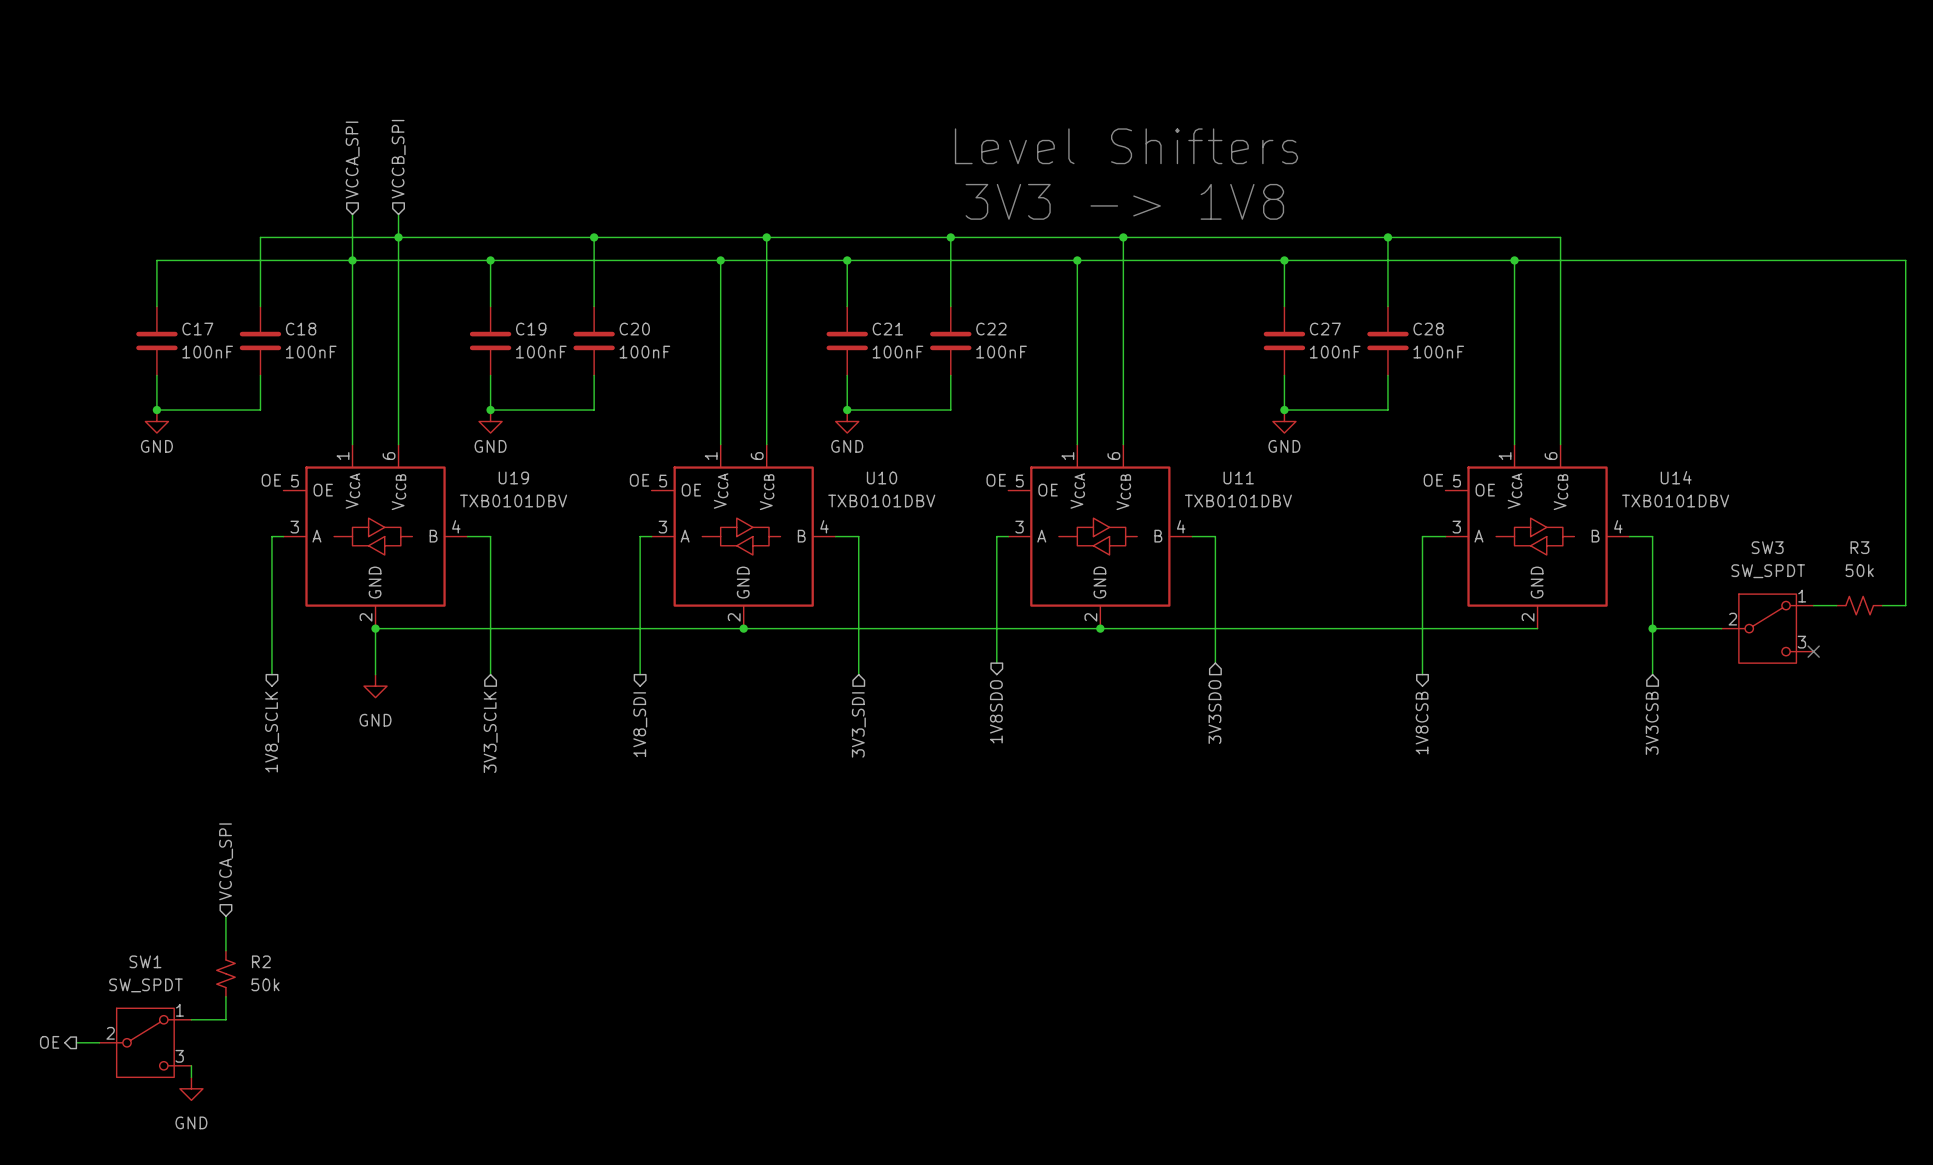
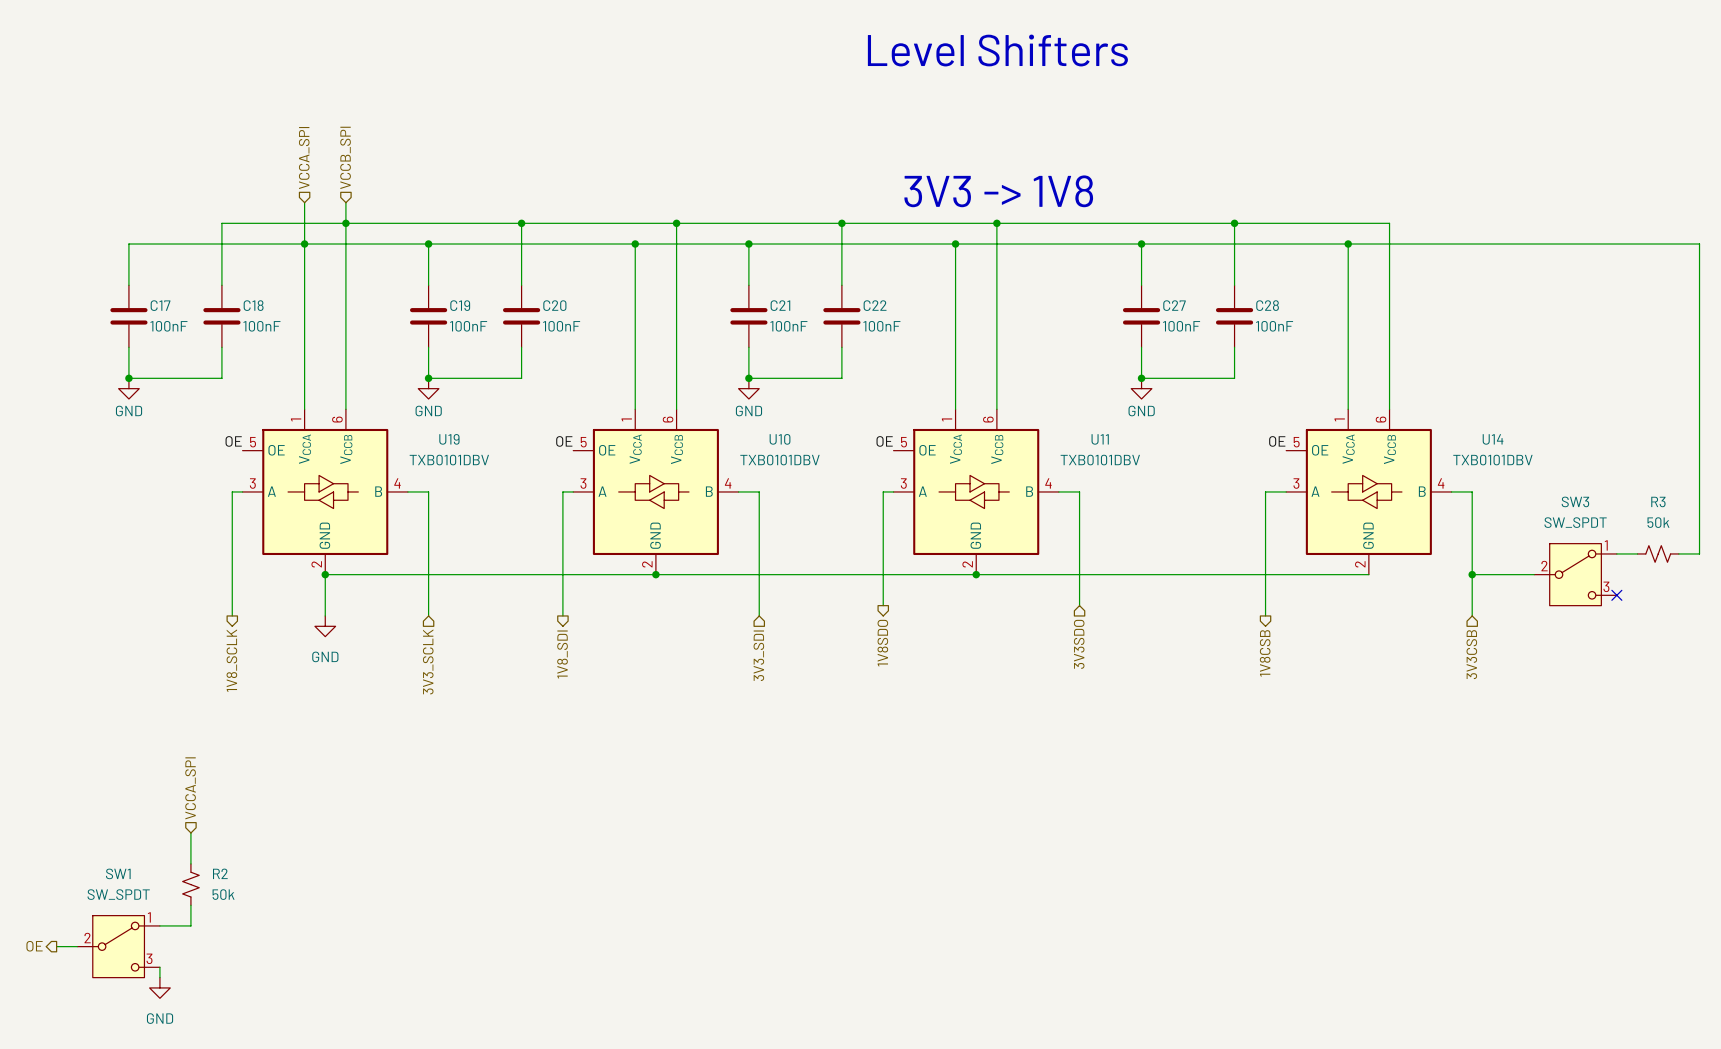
text position: Level Shifters (1126, 146) -> Level Shifters (997, 50)

